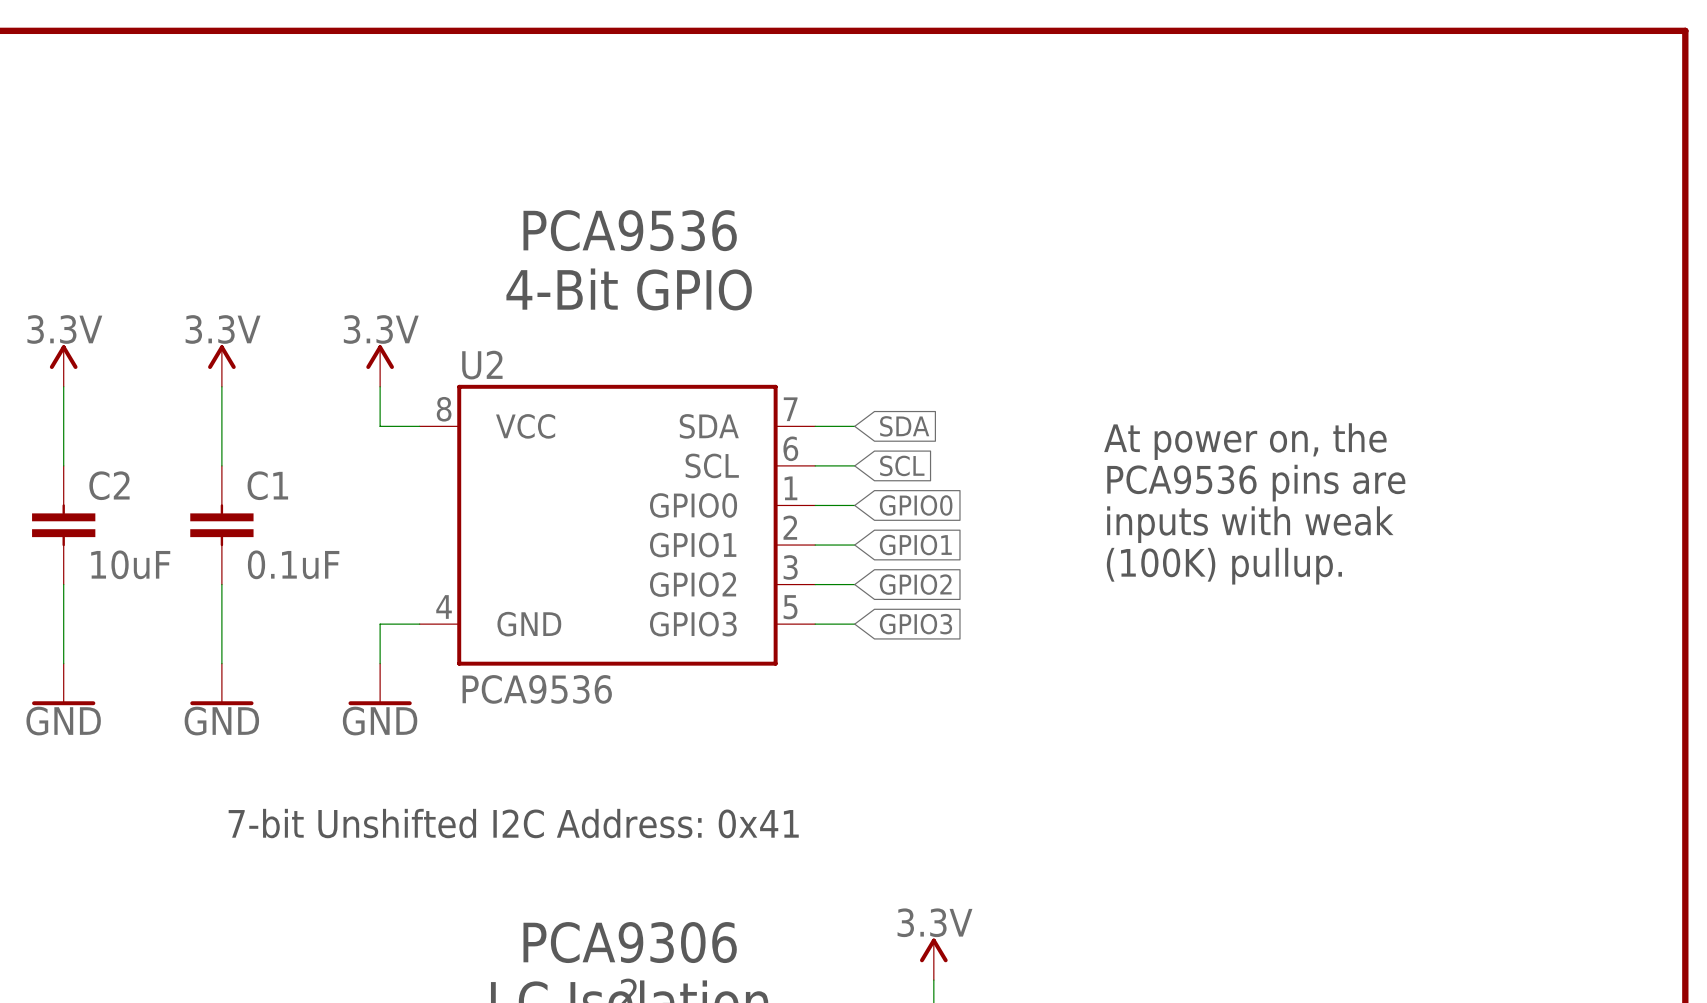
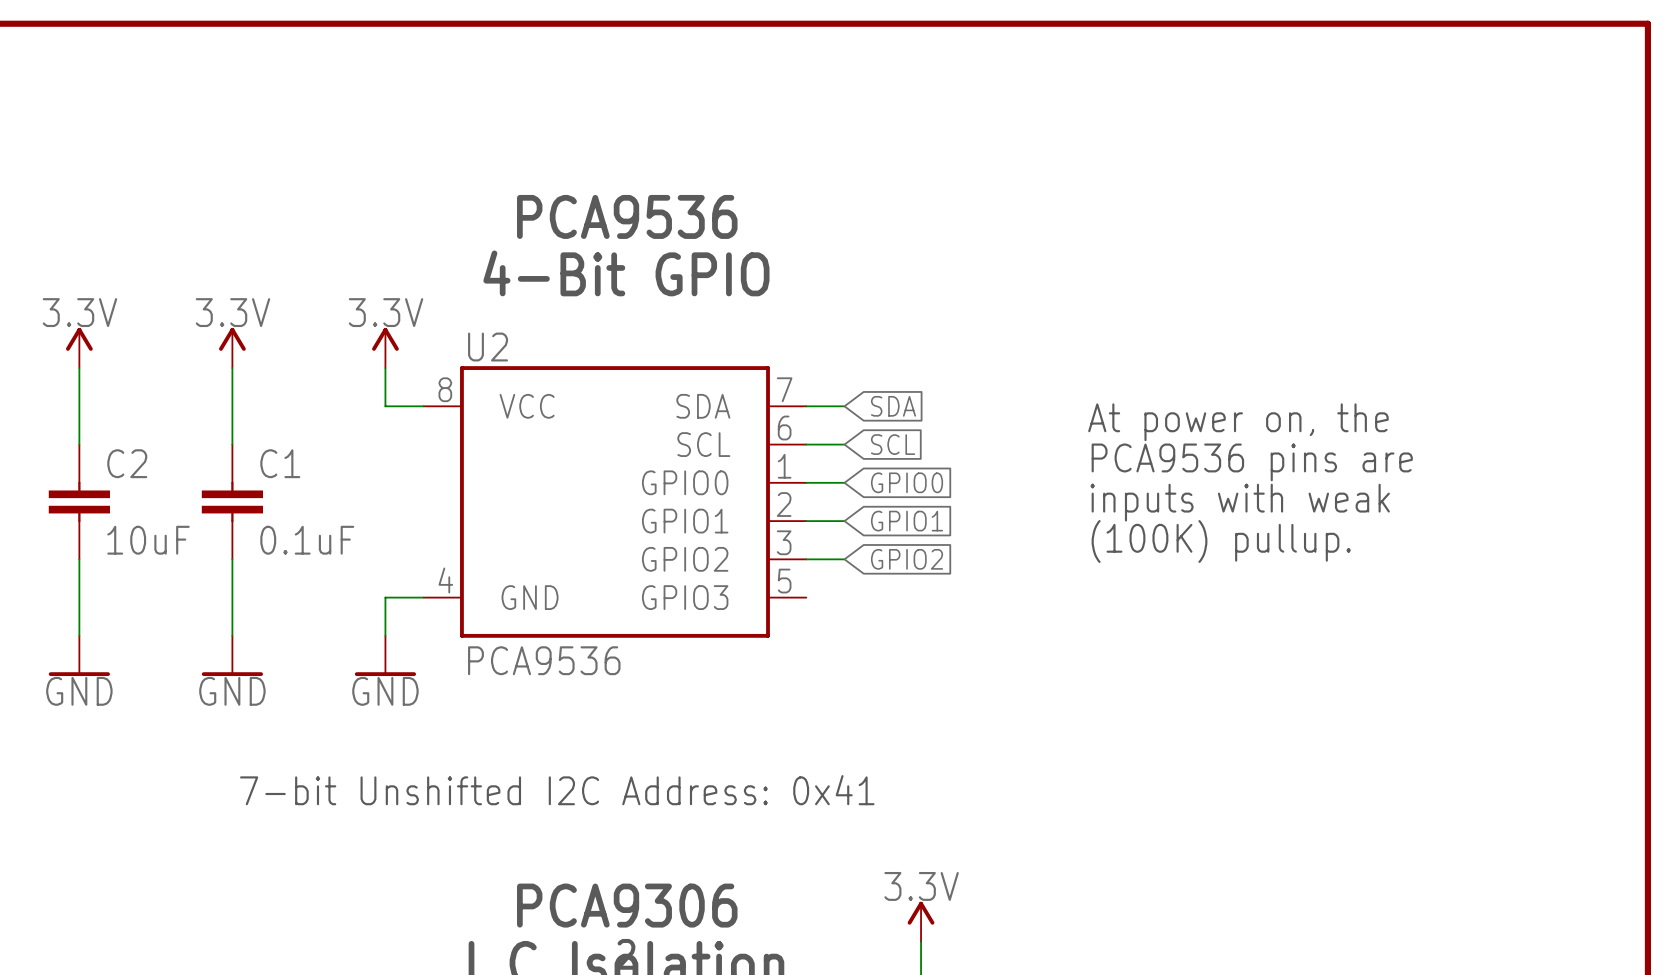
wire: (815, 624) (854, 624) -> none
global label: GPIO3 (915, 624) -> none

